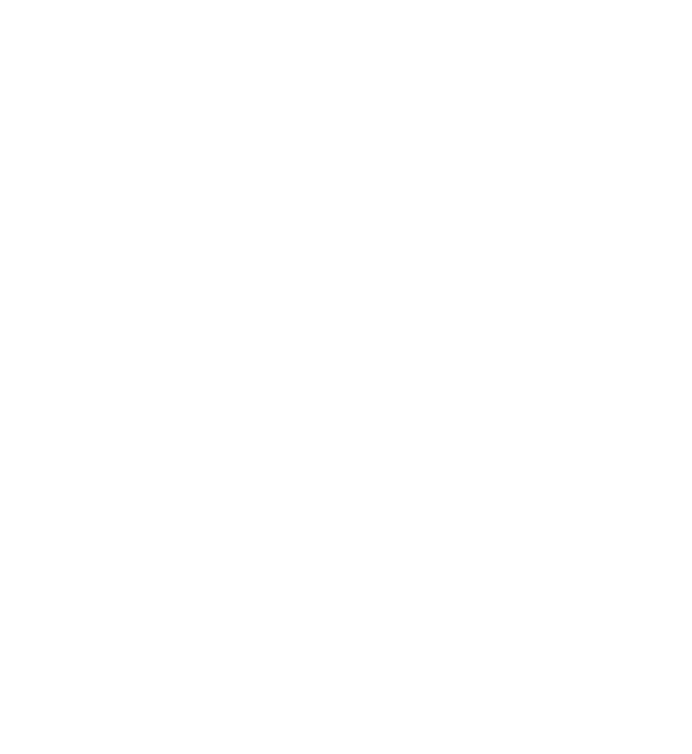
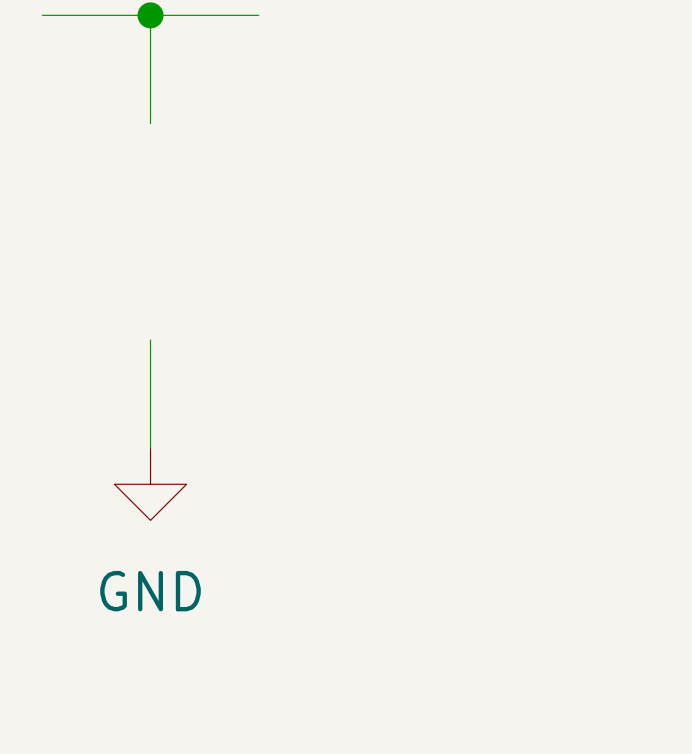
wire: none -> (42, 15) (258, 15)
wire: none -> (150, 15) (150, 123)
junction: none -> (150, 15)
wire: none -> (150, 339) (150, 448)
power symbol: none -> GND (150, 484)

